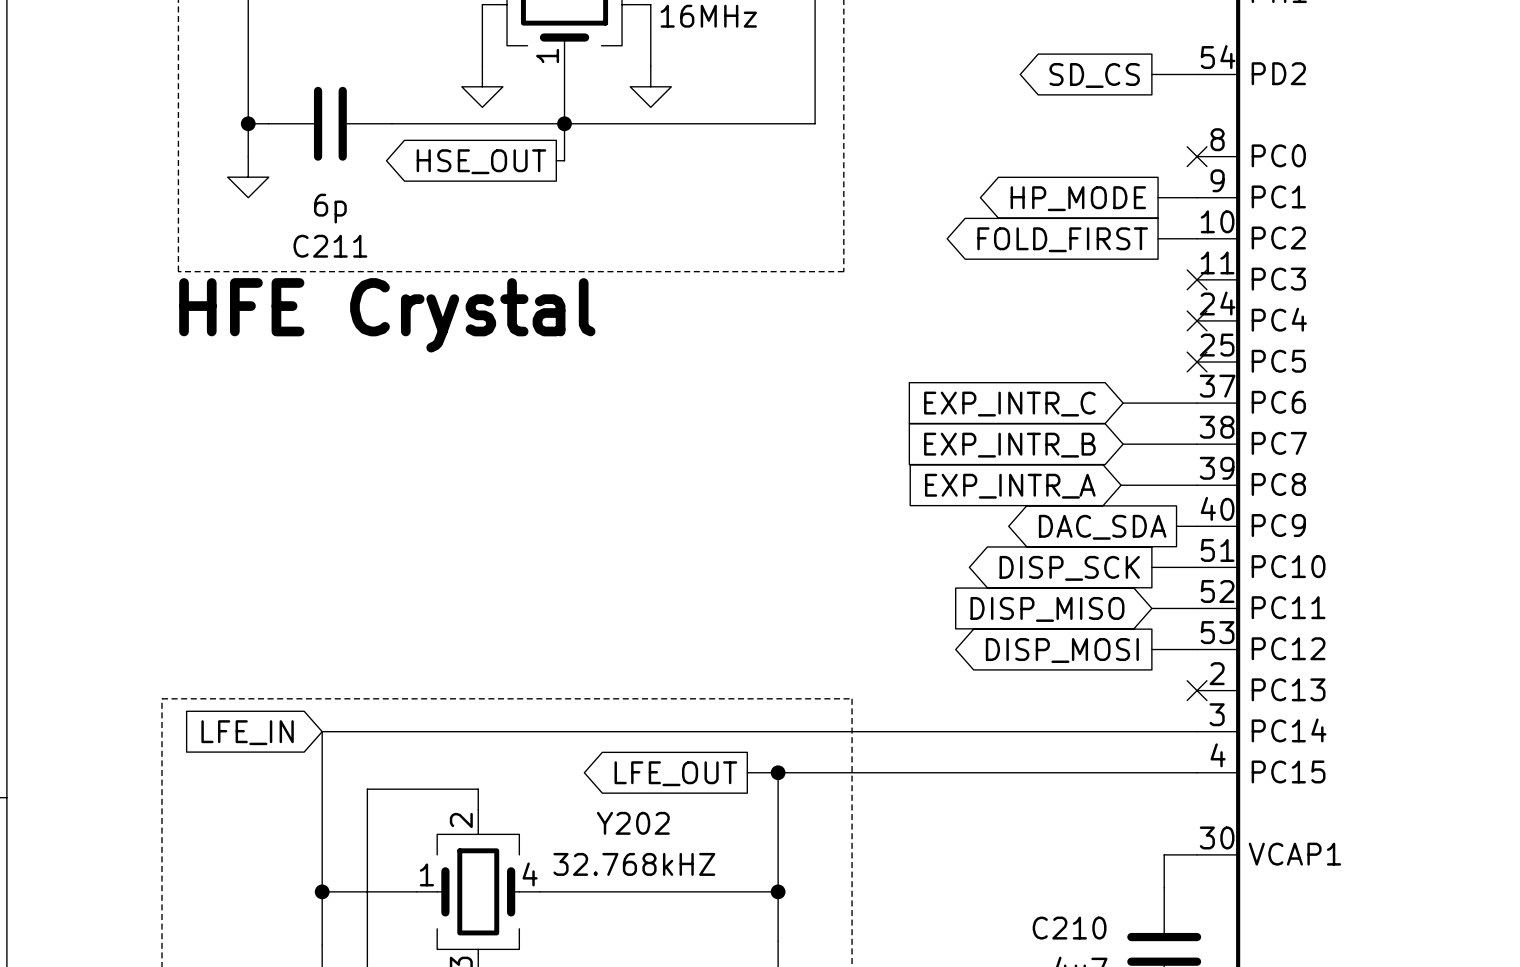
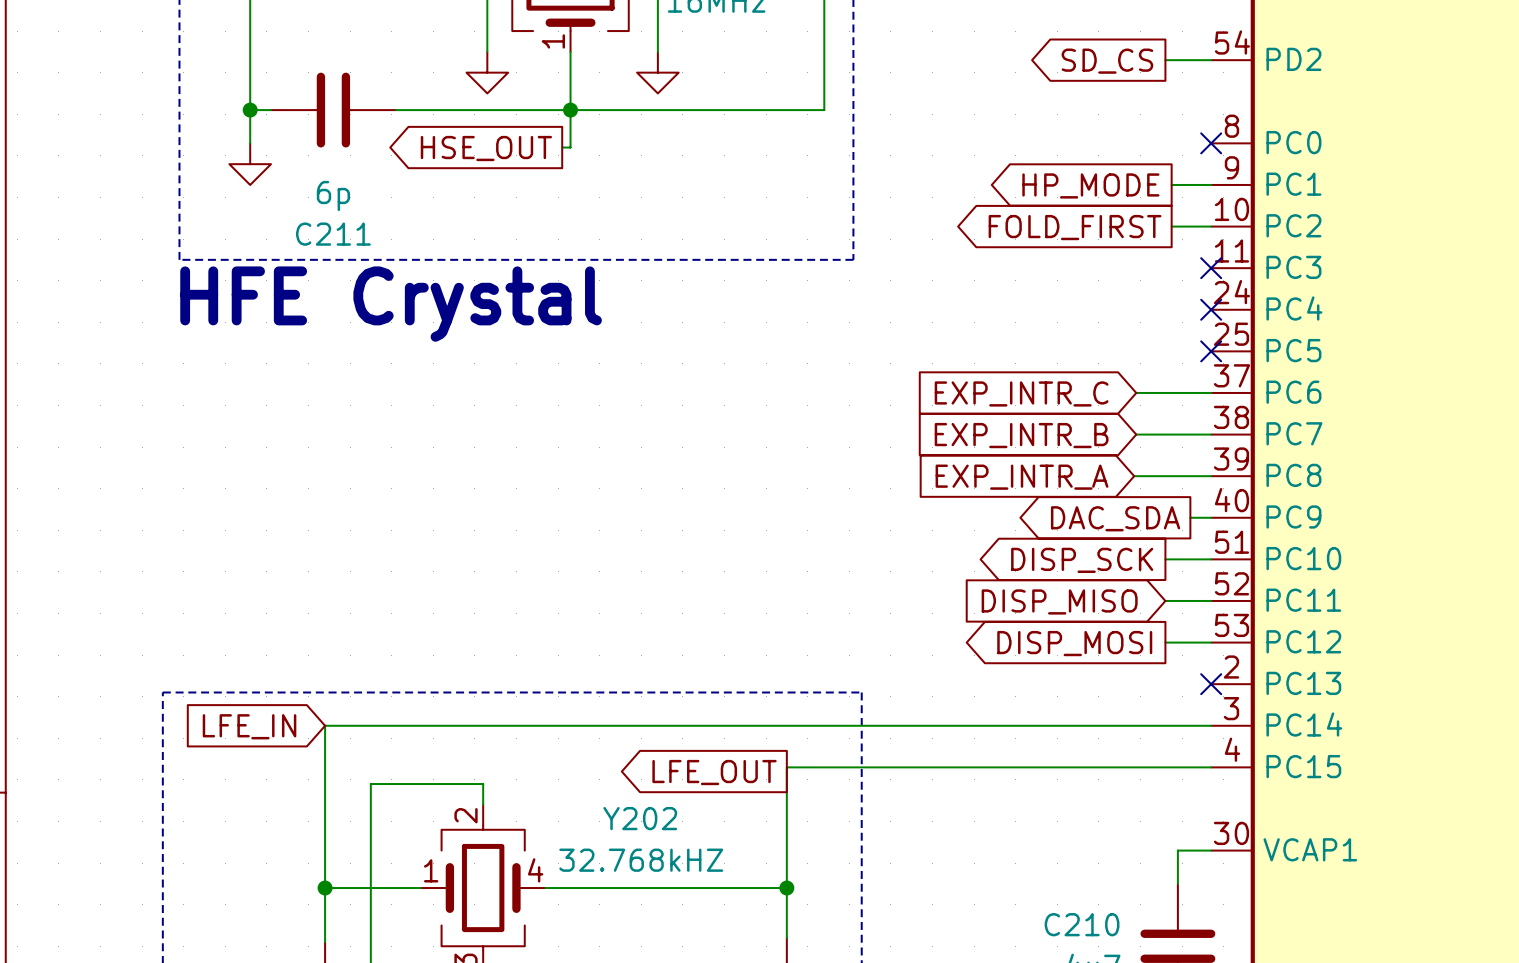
wire: (747, 772) (778, 772) -> none
junction: (778, 772) -> none
global label position: LFE_OUT (675, 773) -> LFE_OUT (714, 772)

